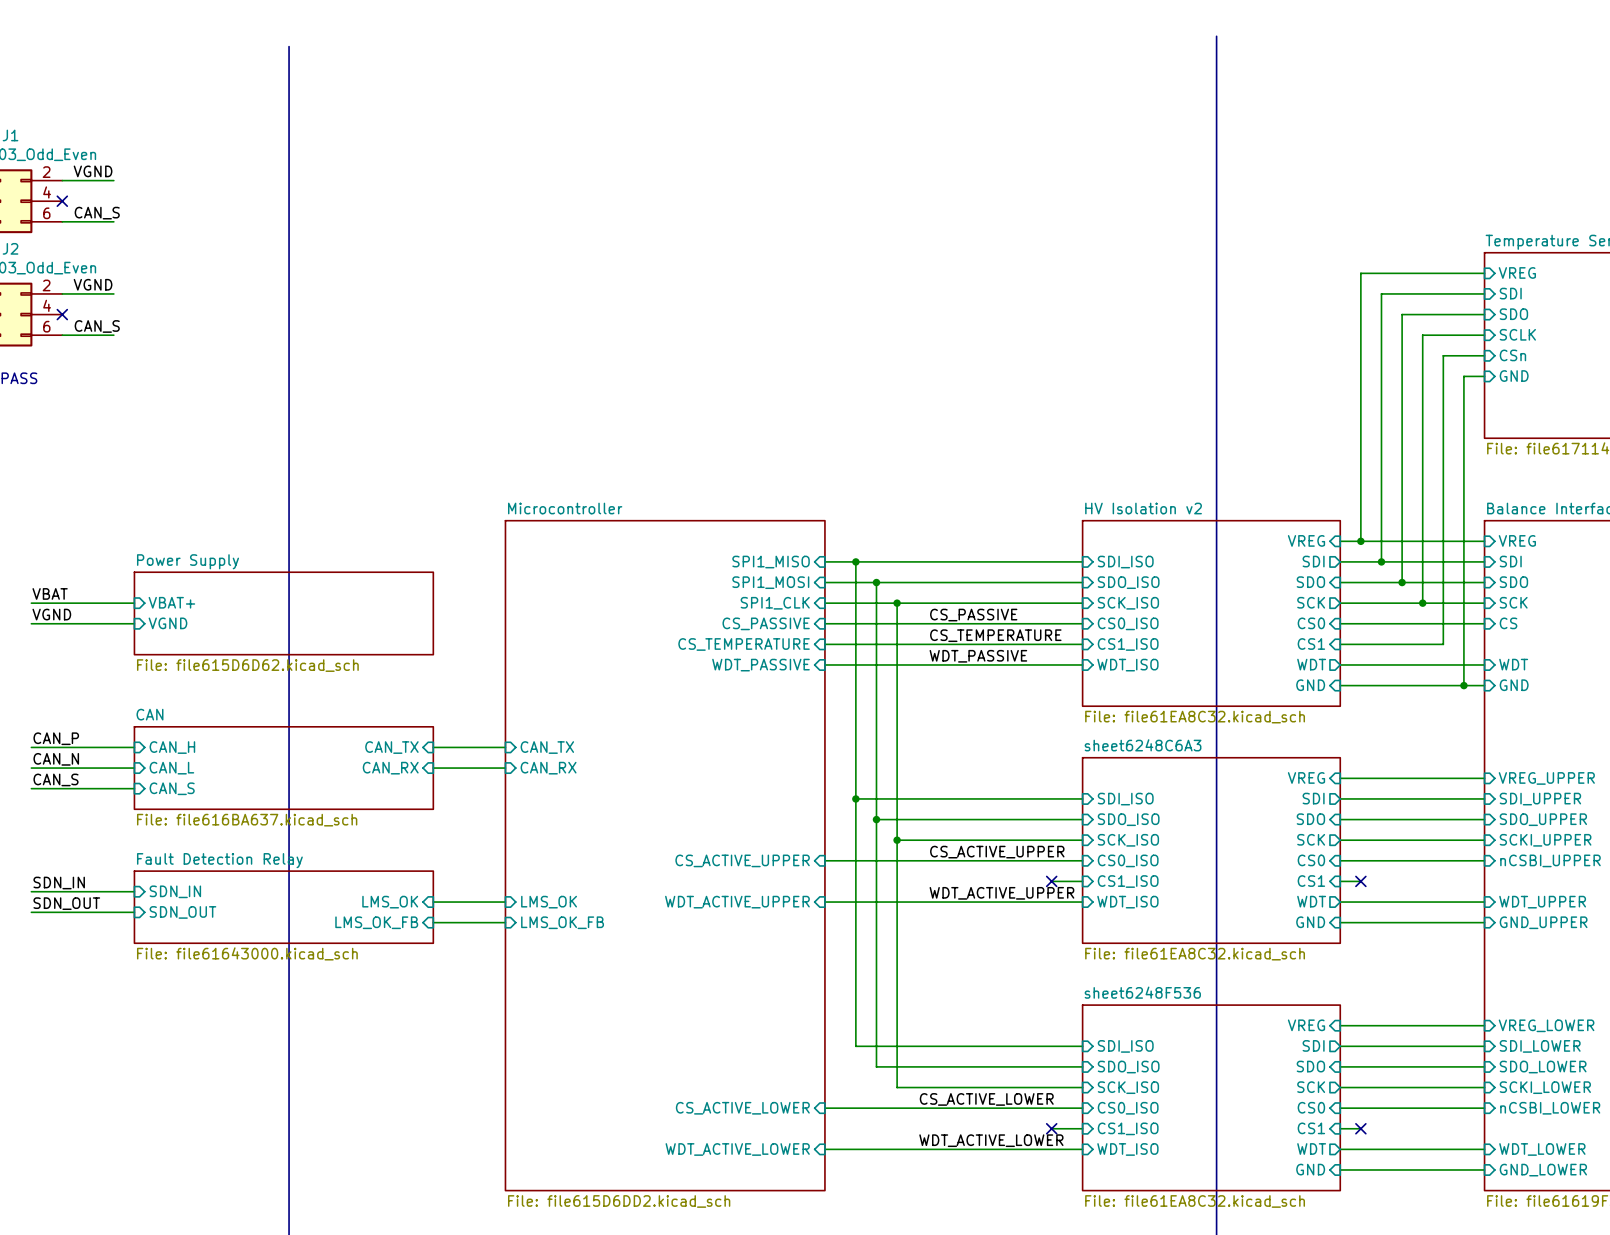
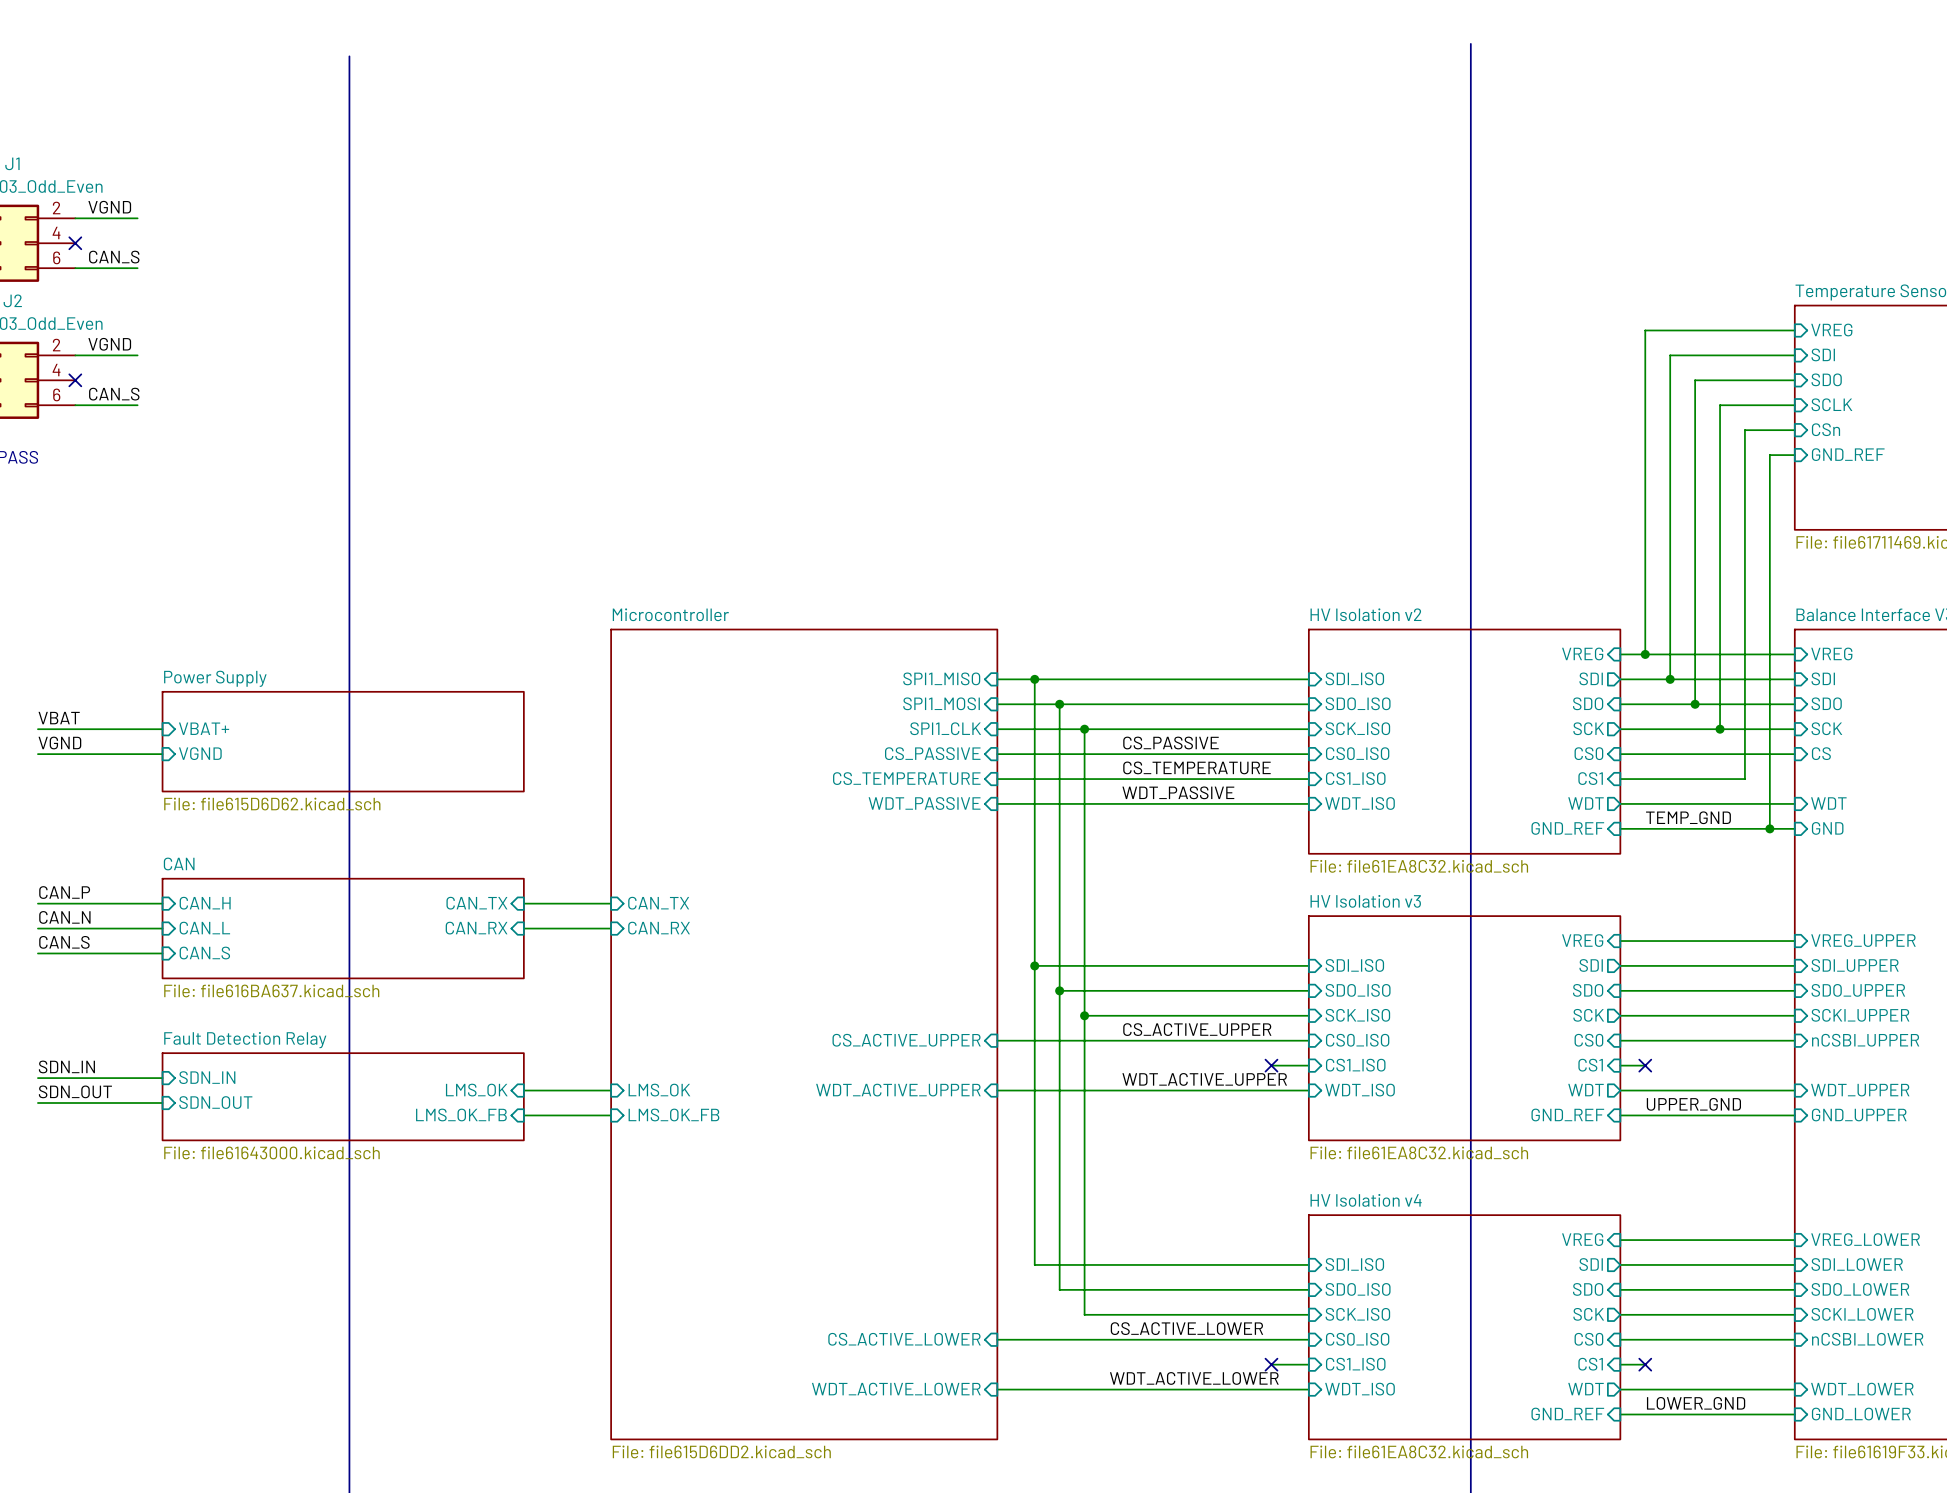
sheet pin: GND (1514, 376) -> GND_REF (1848, 454)
label: none -> TEMP_GND (1688, 817)
sheet pin: GND (1310, 685) -> GND_REF (1567, 828)
sheet sheet6248C6A3 name: sheet6248C6A3 (1143, 745) -> HV Isolation v3 (1365, 901)
label: none -> UPPER_GND (1693, 1104)
sheet pin: GND (1310, 922) -> GND_REF (1567, 1114)
sheet sheet6248F536 name: sheet6248F536 (1142, 992) -> HV Isolation v4 (1366, 1200)
label: none -> LOWER_GND (1696, 1403)
sheet pin: GND (1310, 1169) -> GND_REF (1567, 1414)

